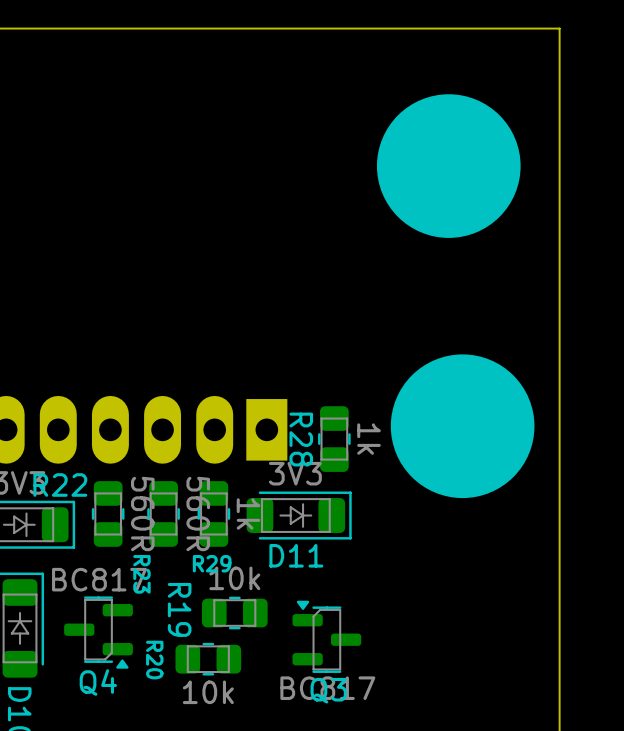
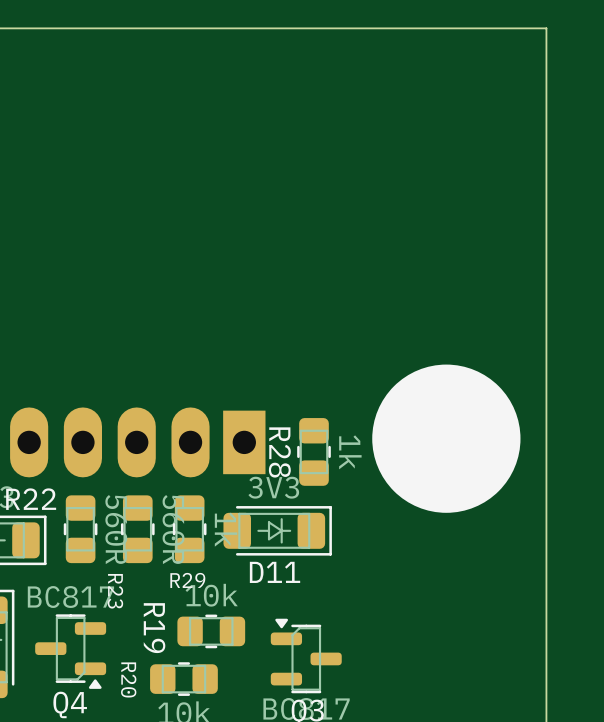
drawing: [376, 94, 521, 238] -> none

